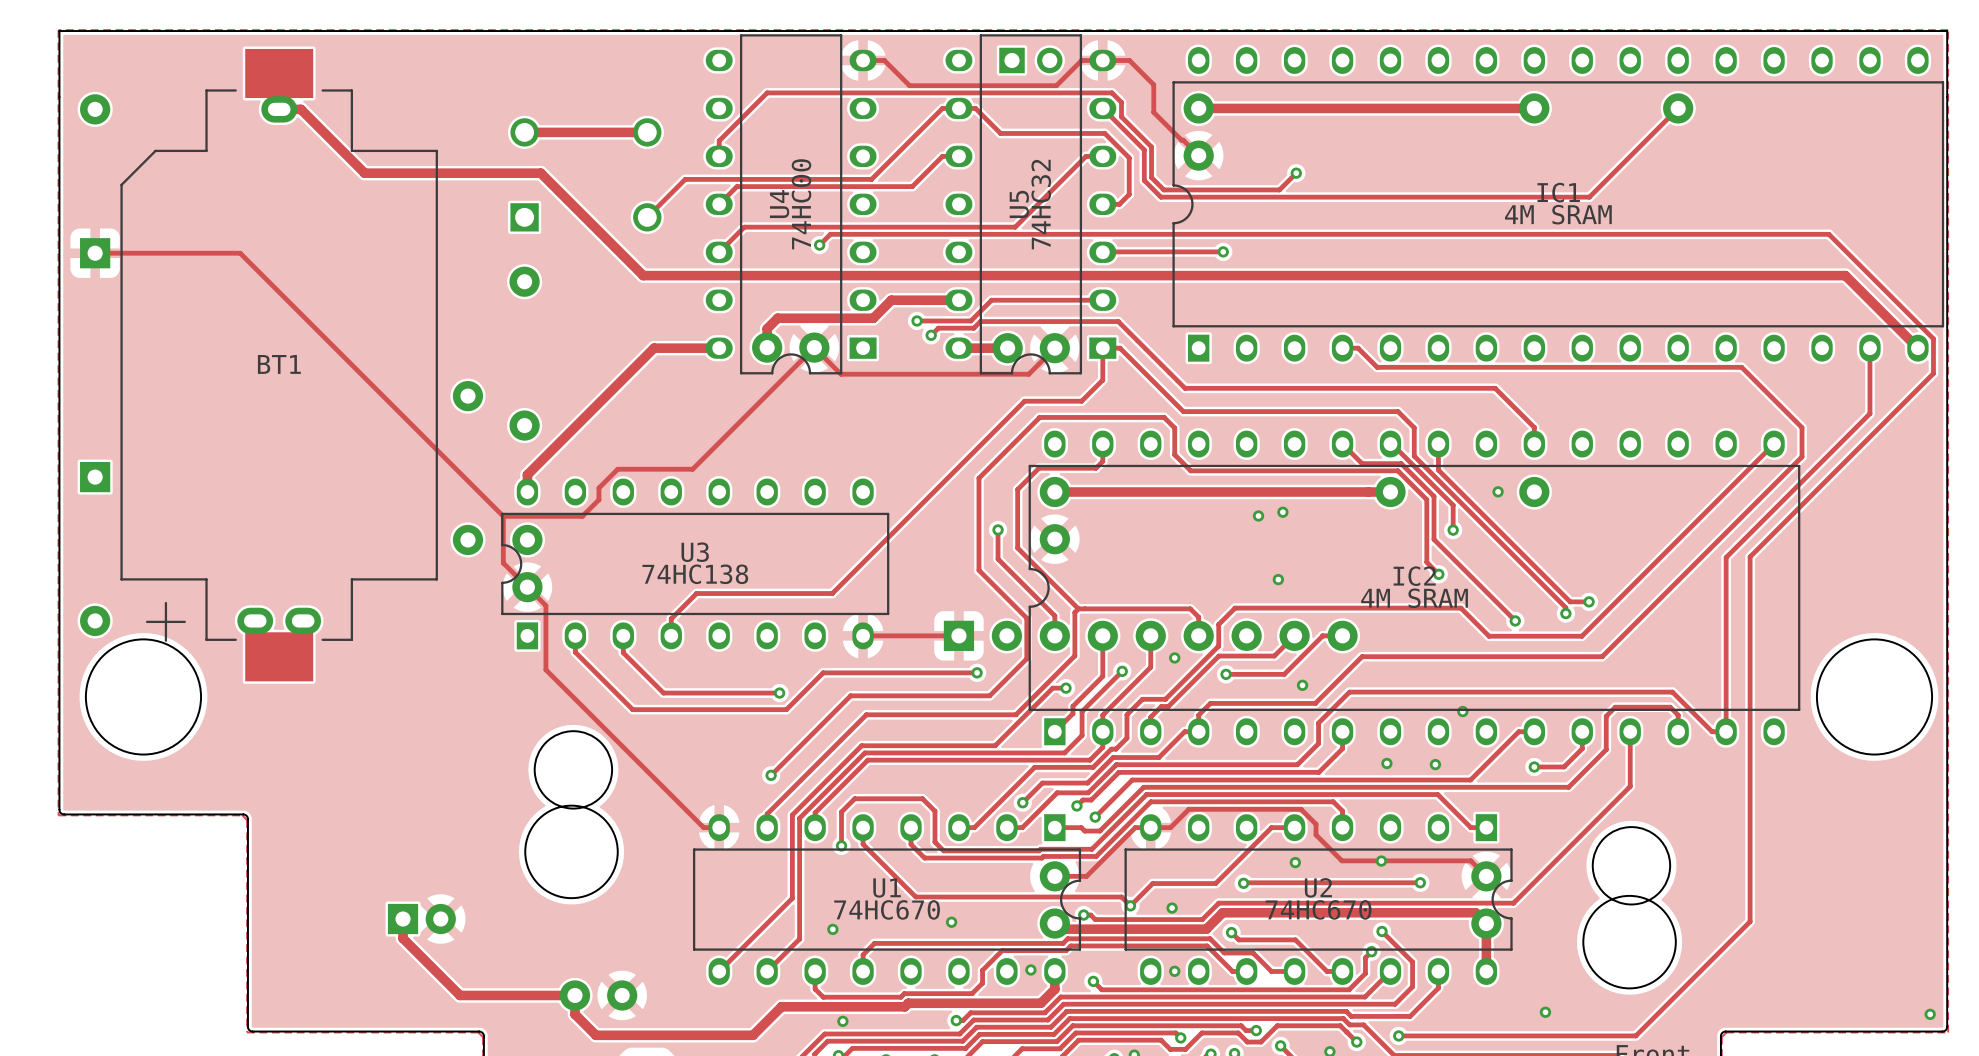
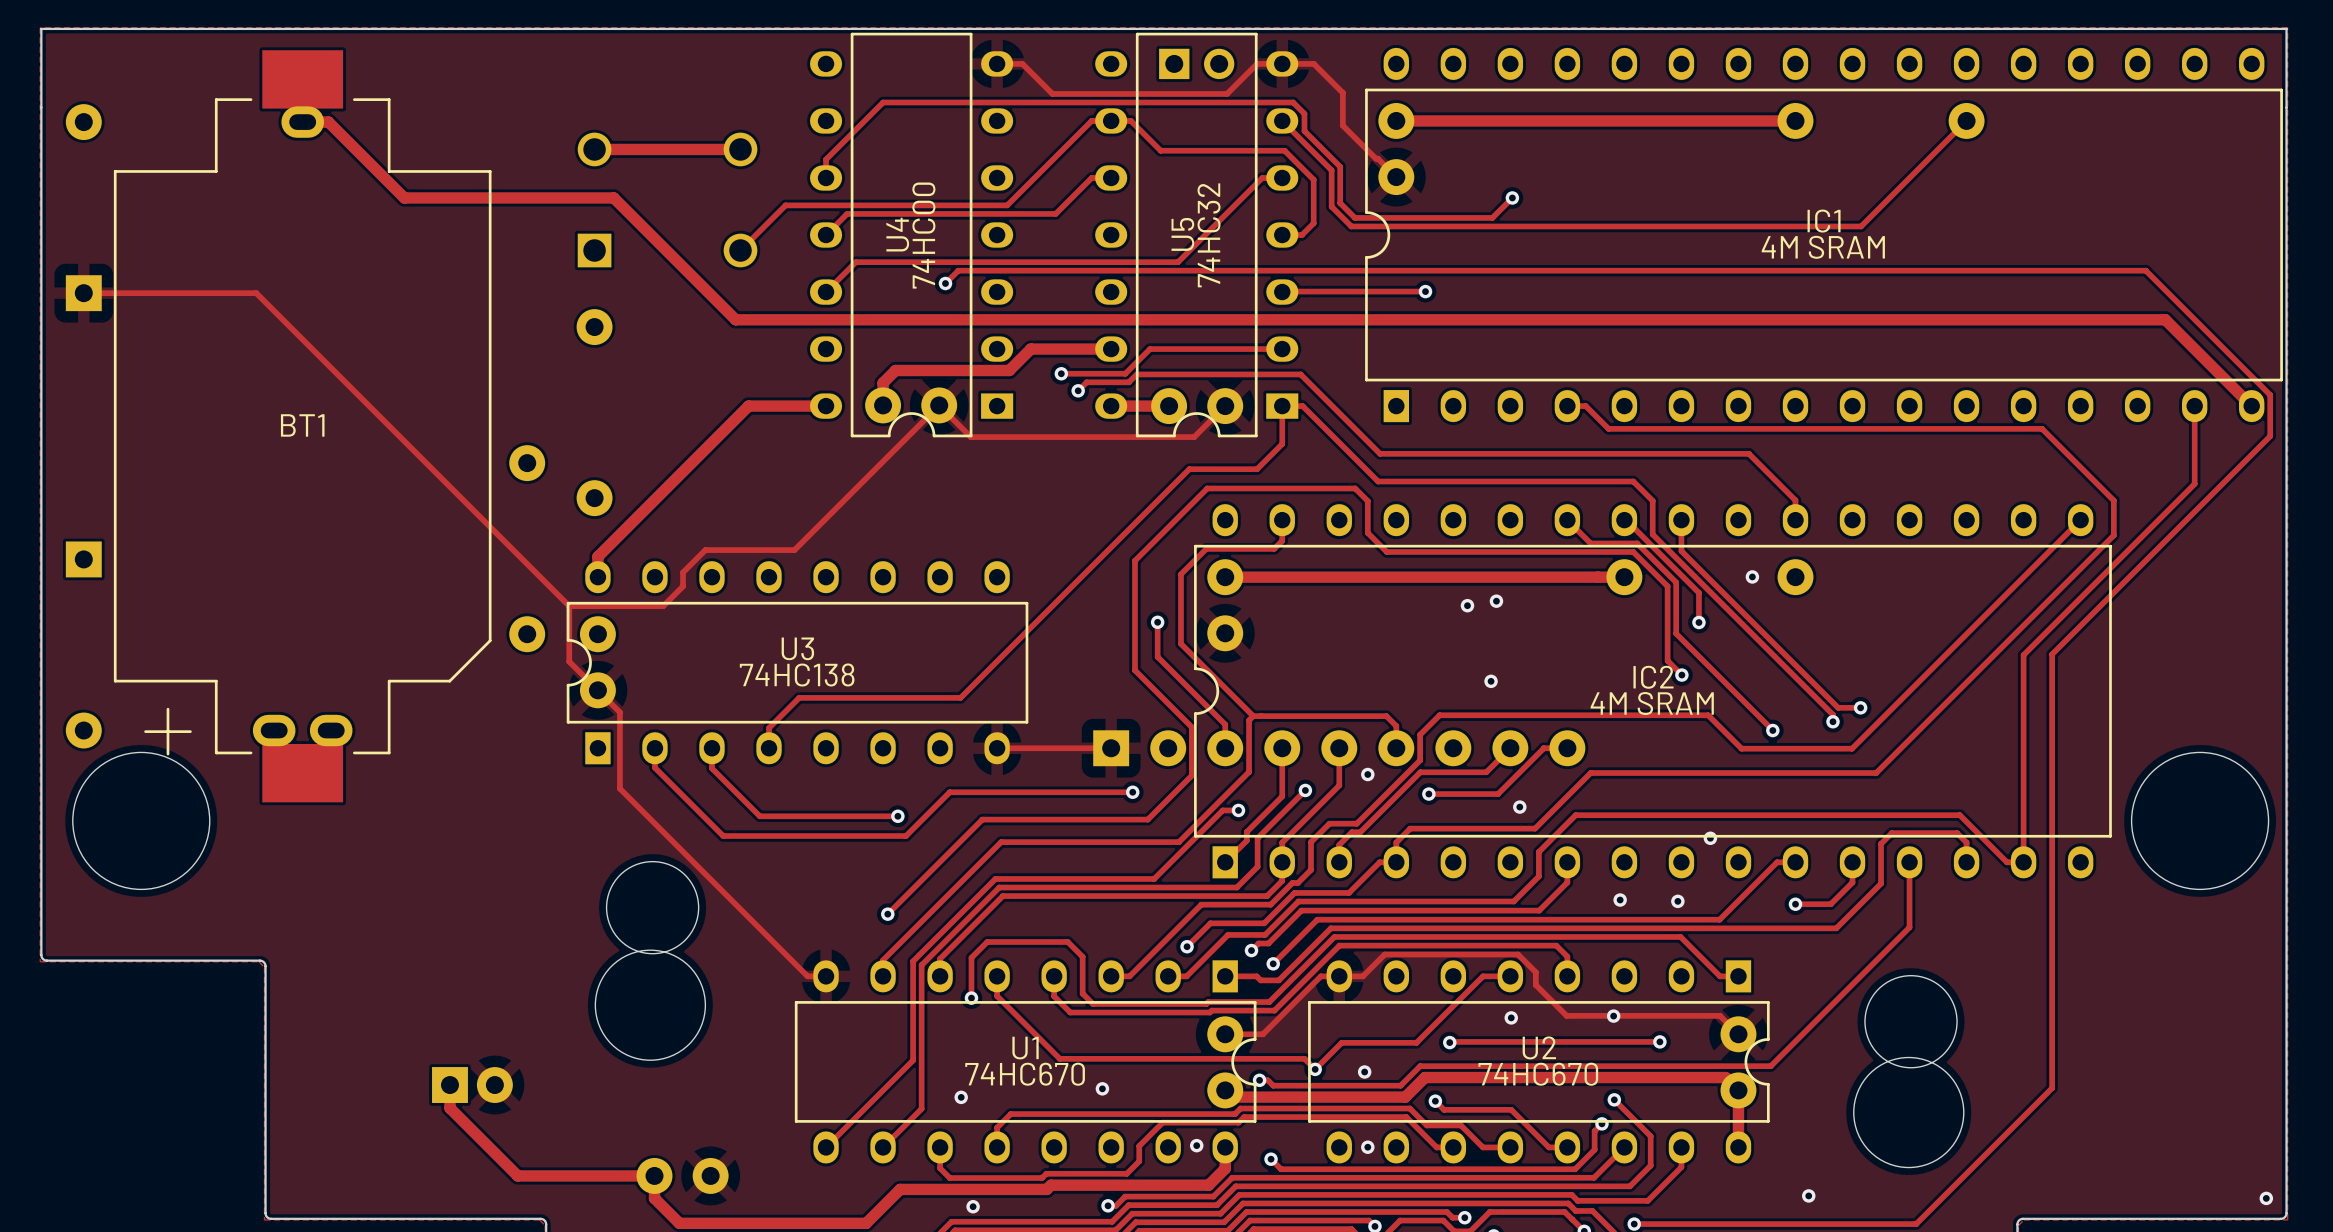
BT1 footprint: [120, 48, 438, 682] -> [113, 50, 492, 803]

